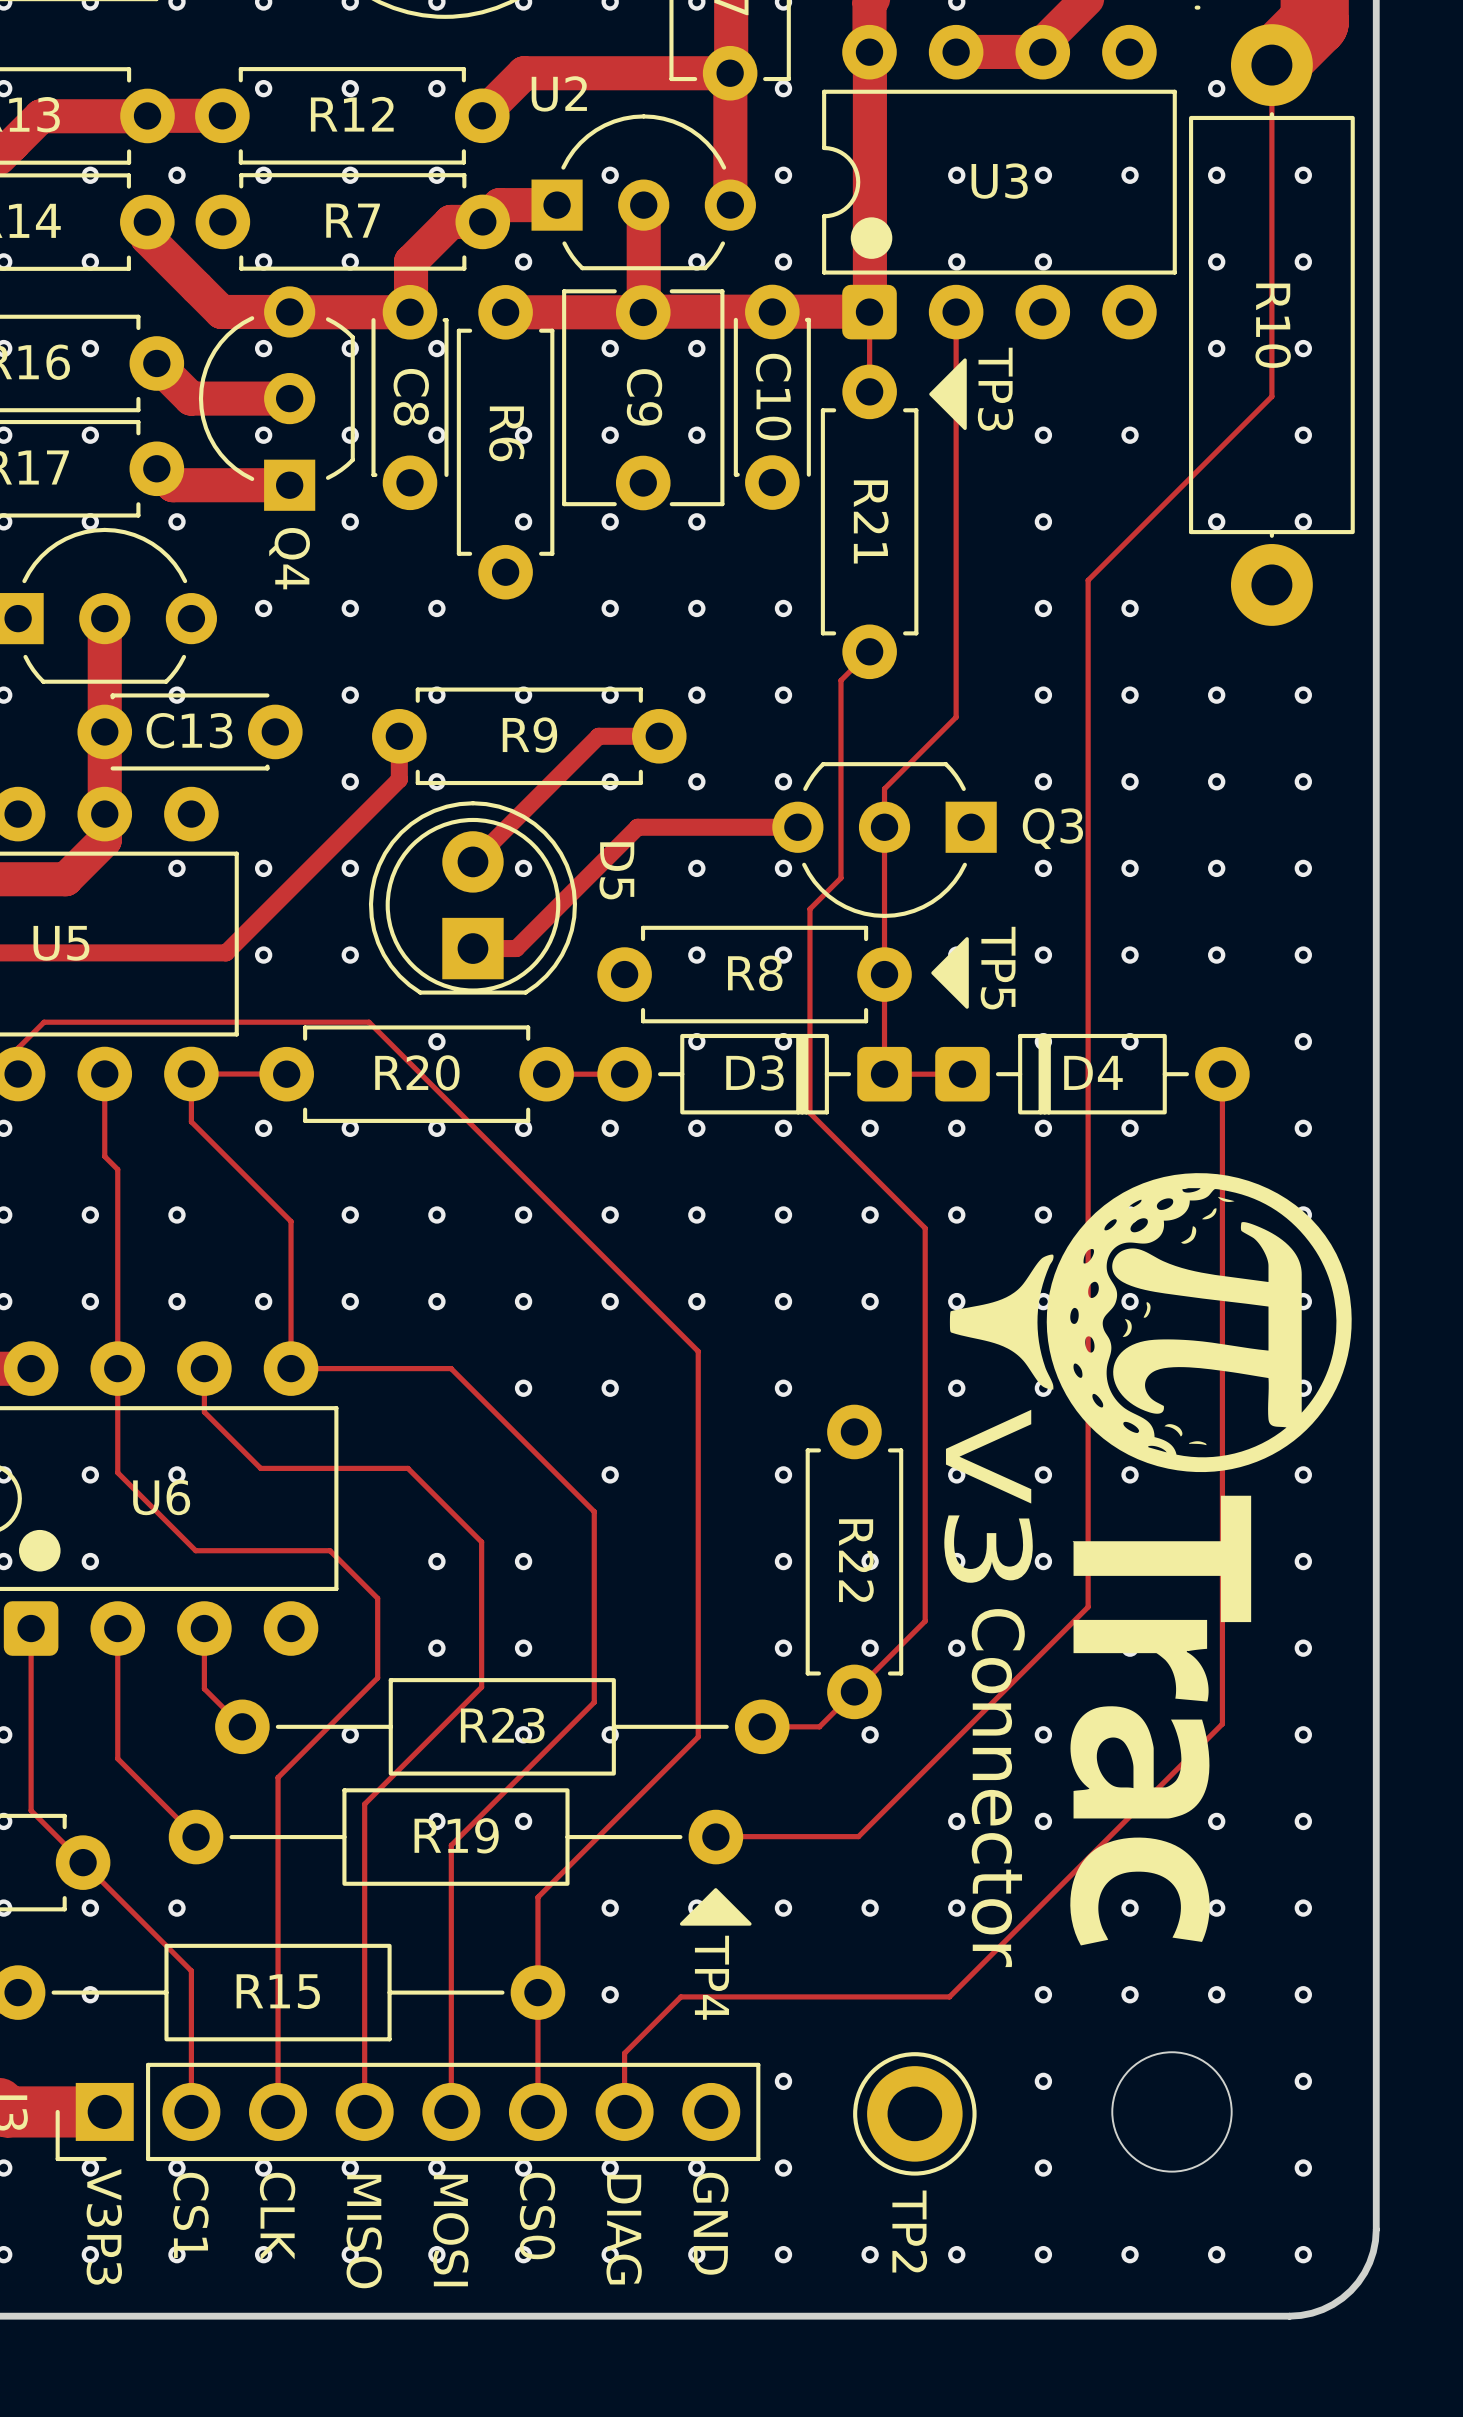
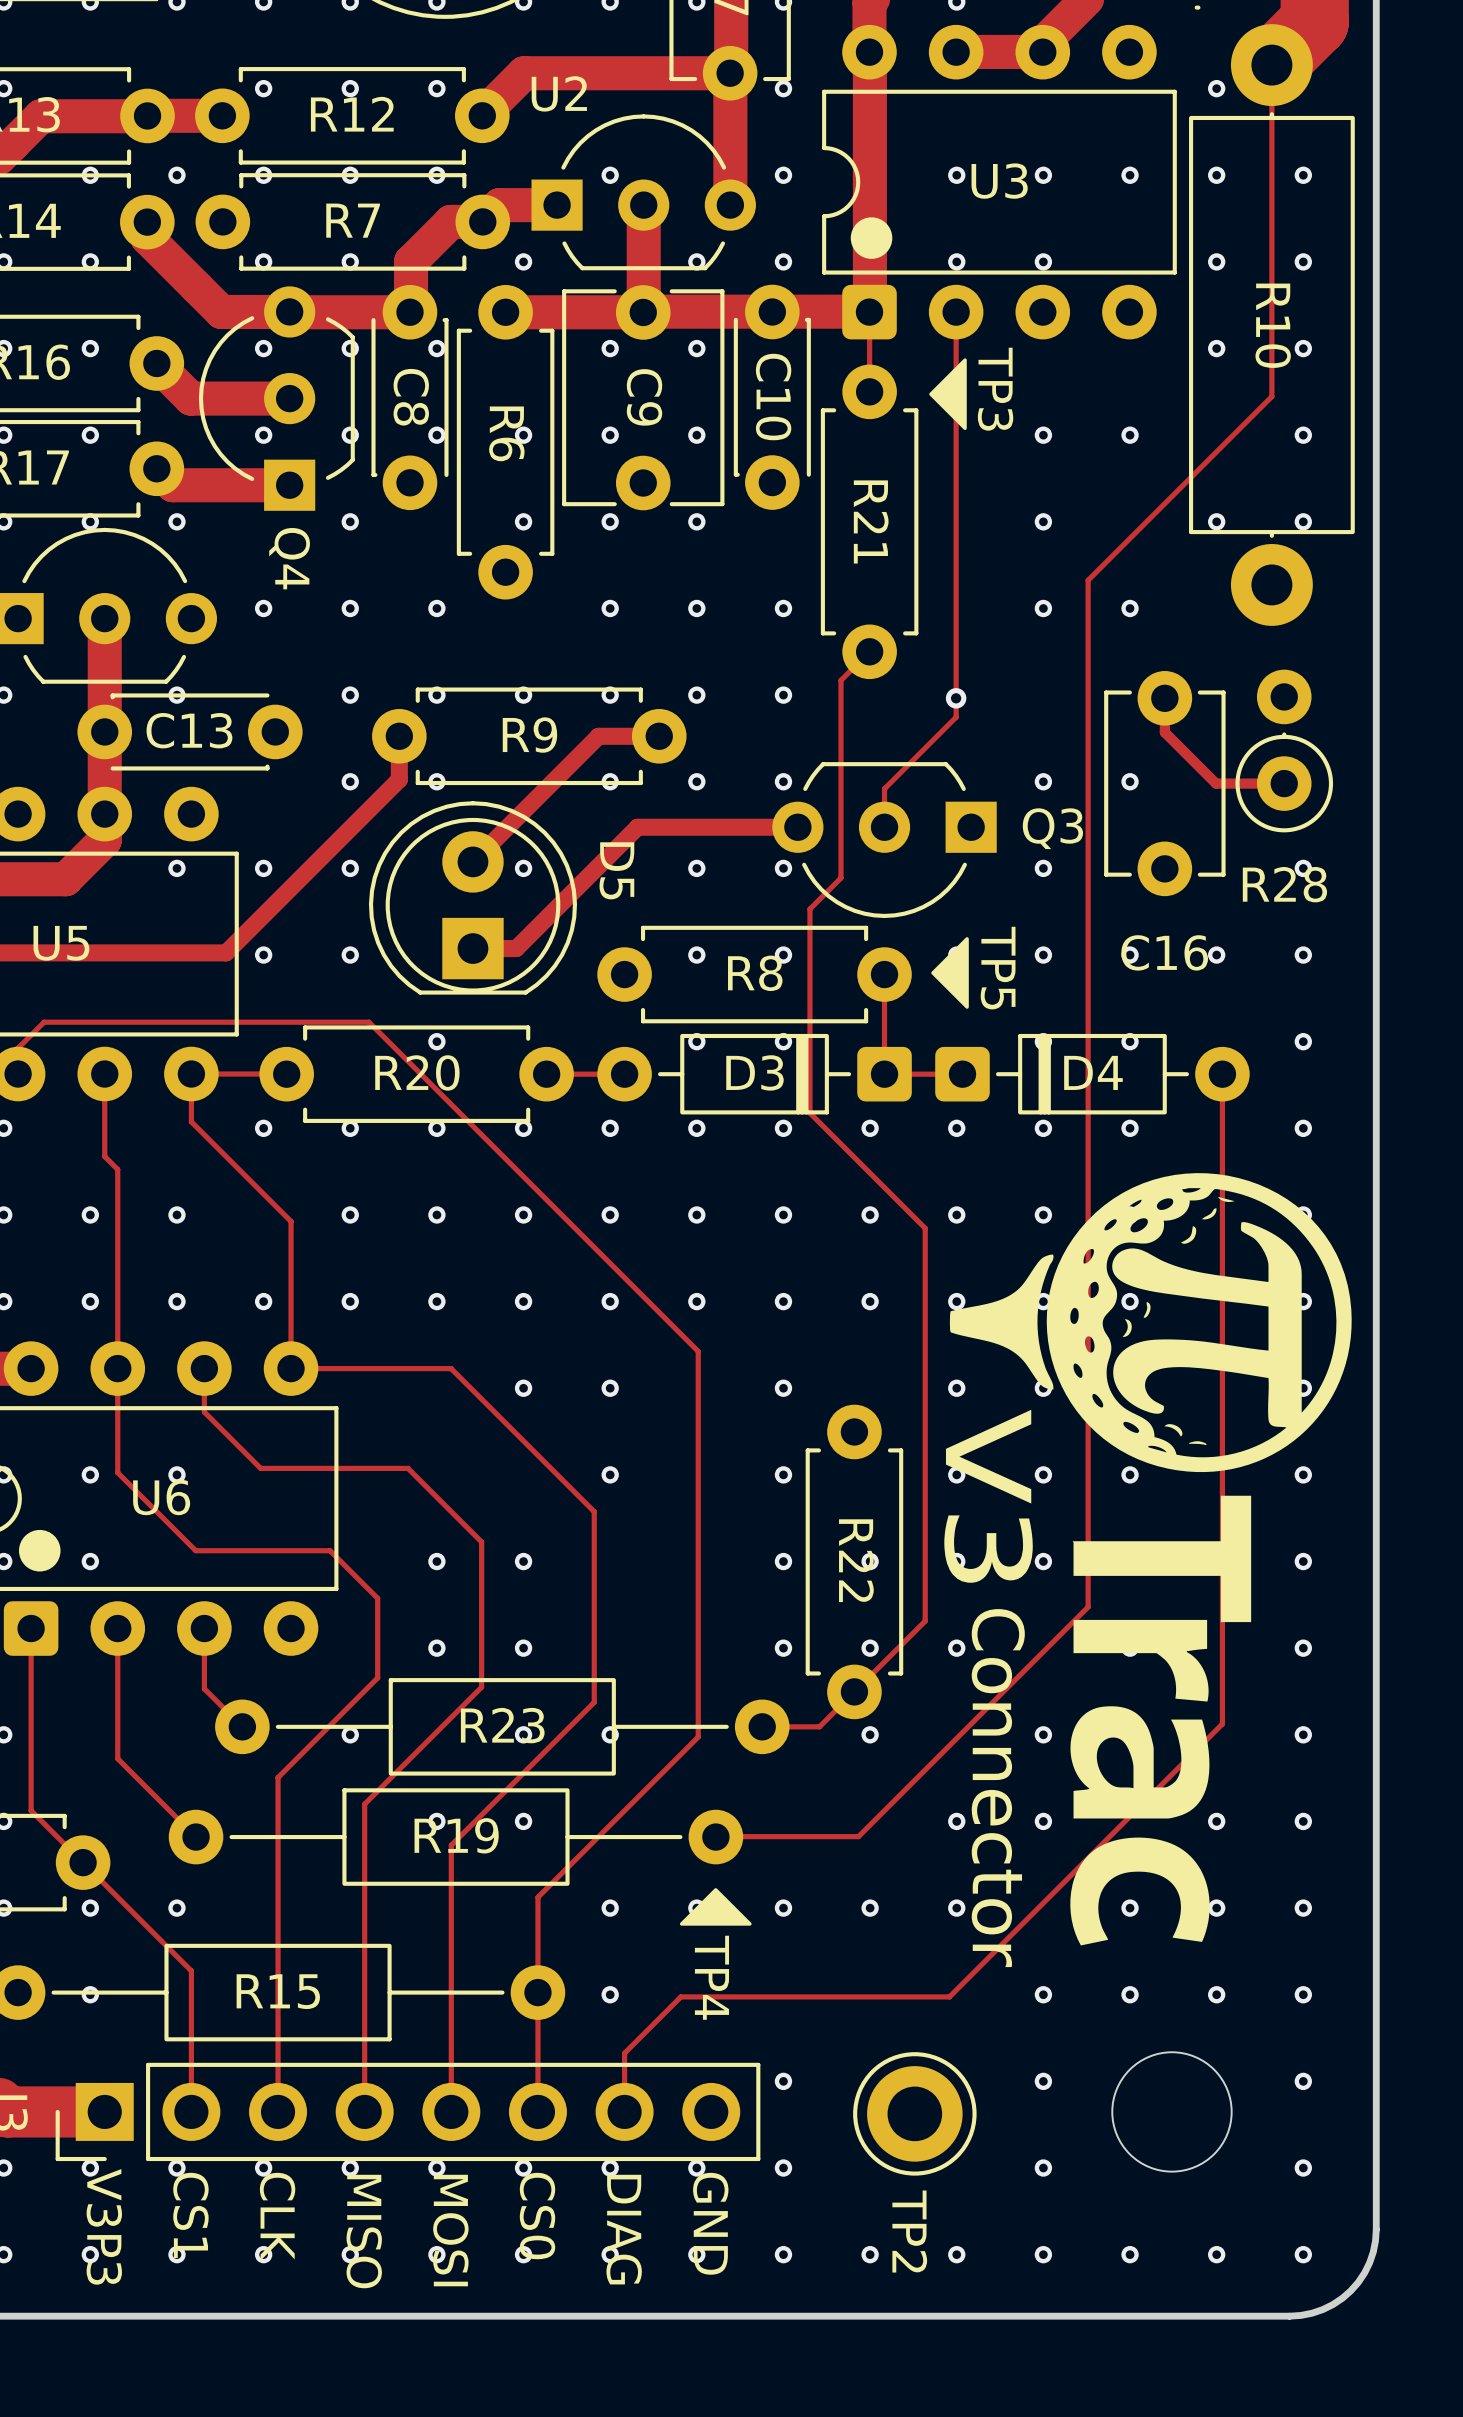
via: (1043, 695) -> none
via: (1130, 695) -> none
via: (1216, 695) -> none
via: (1303, 695) -> none
via: none -> (956, 698)
track: none -> (1164, 698) (1164, 732) (1216, 783) (1284, 783)
R28: none -> (1284, 751)
via: (1216, 781) -> none
via: (1303, 781) -> none
C16: none -> (1164, 783)
track: (884, 827) (884, 974) -> none
via: (1130, 868) -> none
via: (1216, 868) -> none

